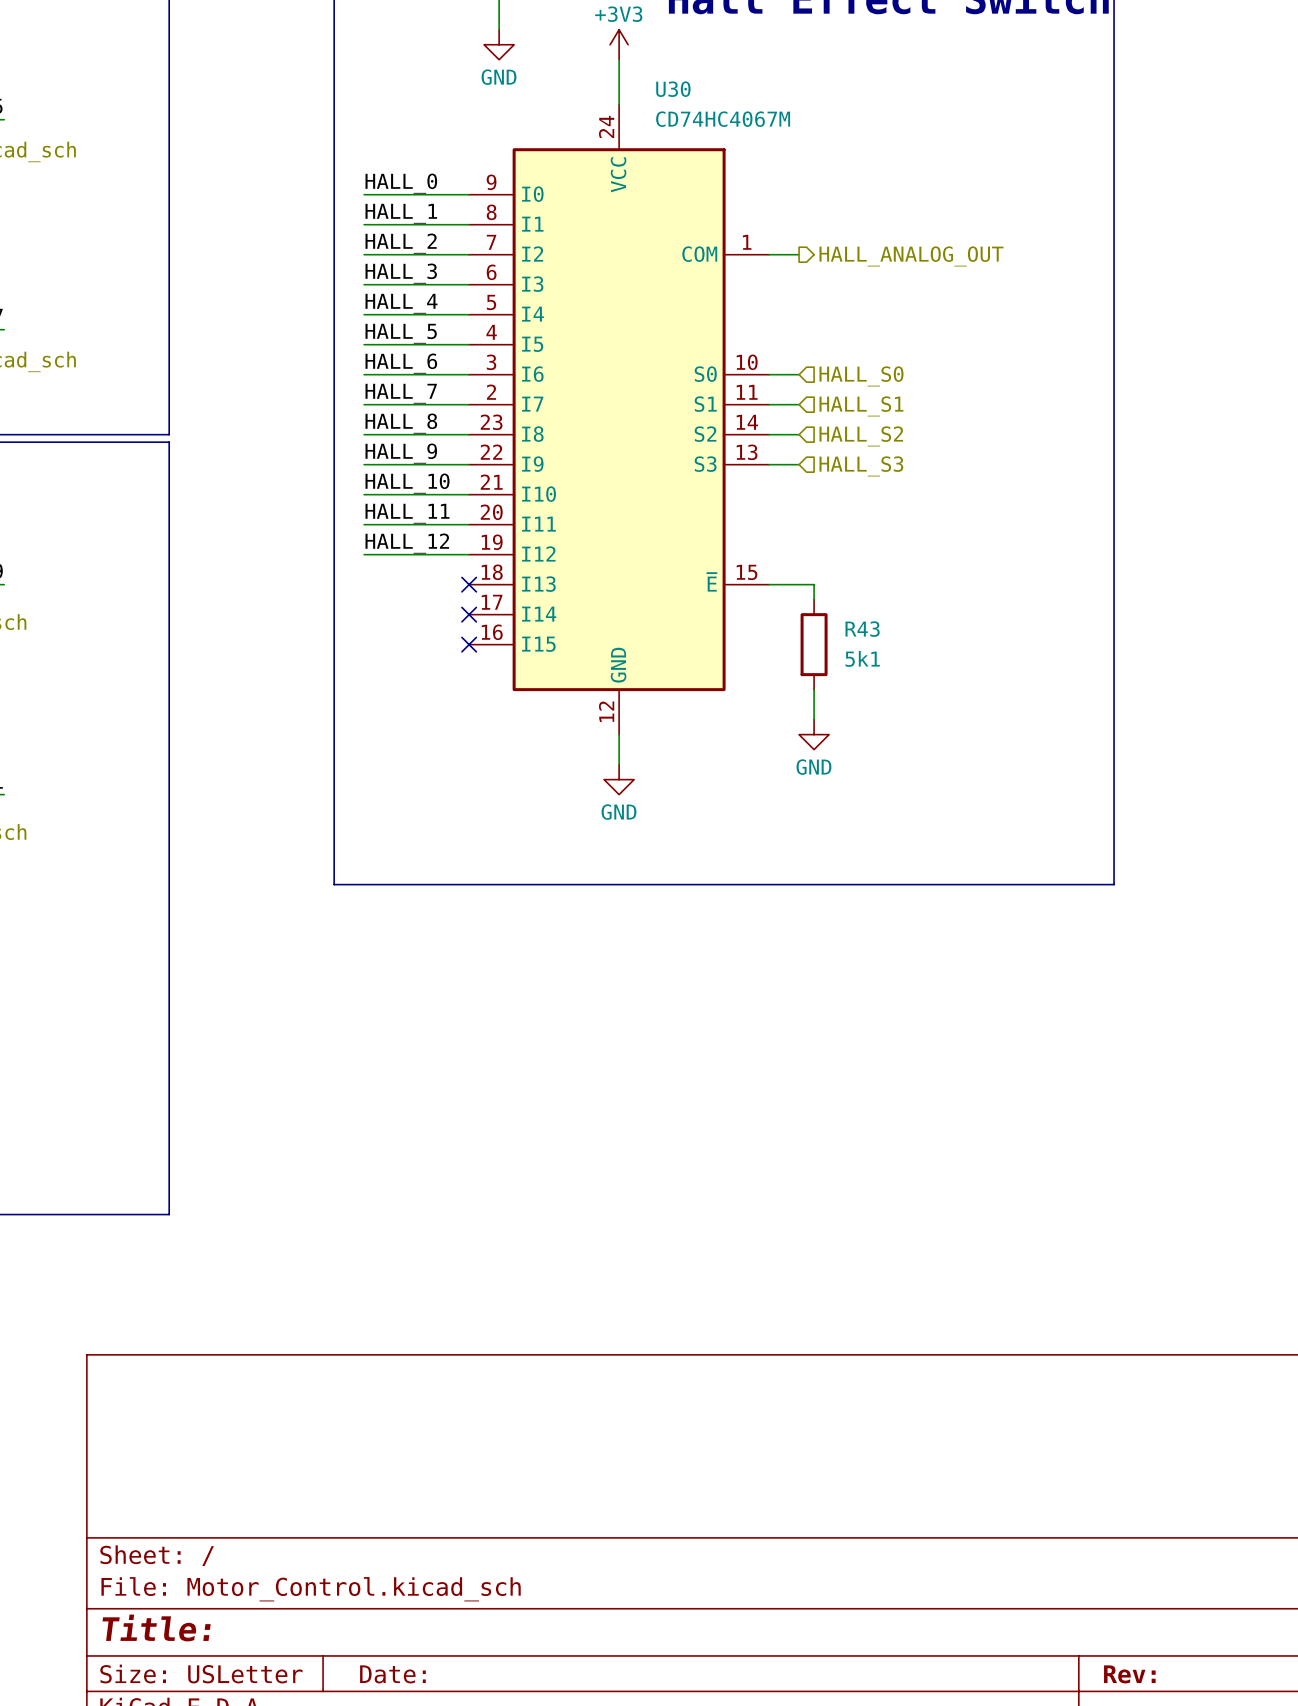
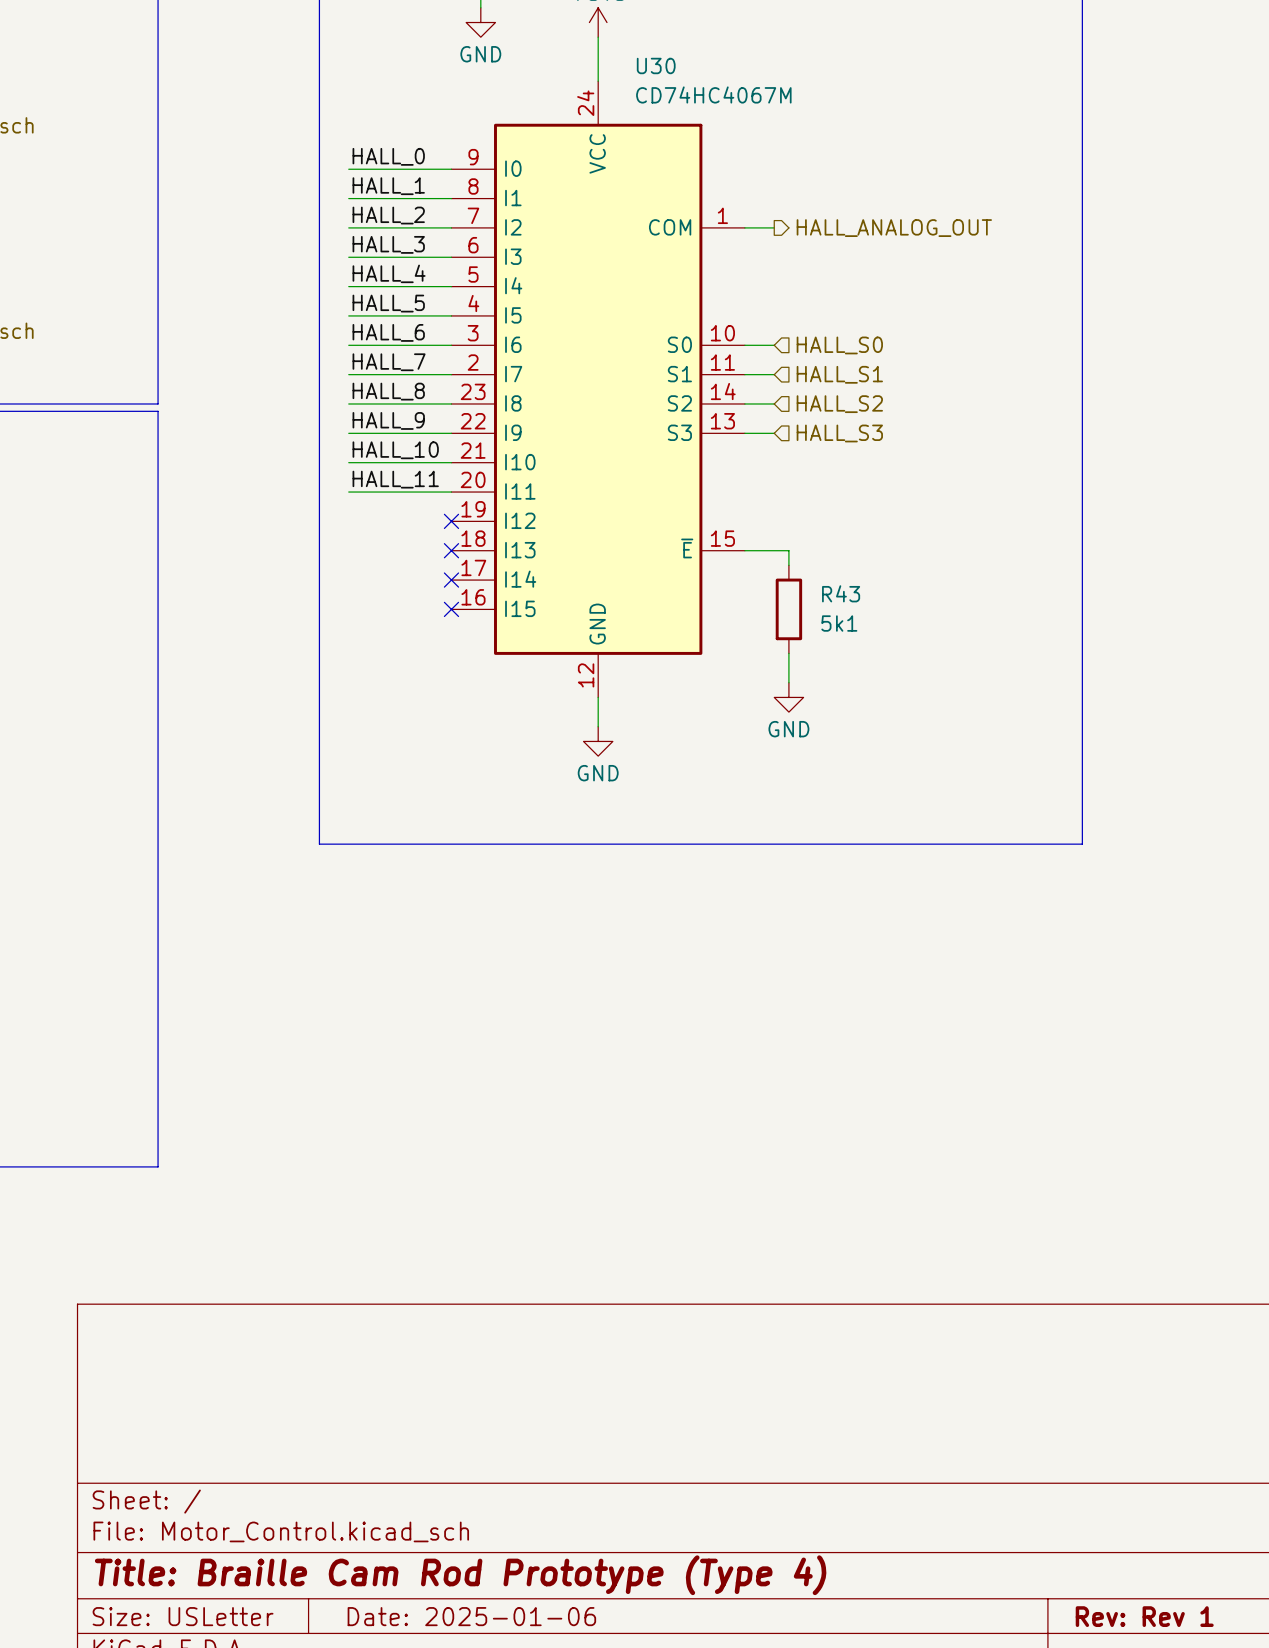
label: HALL_12 (407, 543) -> none
wire: (364, 554) (469, 554) -> none
no-connect mark: none -> (451, 521)
title block: Title: (156, 1627) -> Title: Braille Cam Rod Prototype (Type 4) (460, 1575)
title block: Date: (392, 1674) -> Date: 2025-01-06 (471, 1616)
title block: Rev: (1129, 1674) -> Rev: Rev 1 (1144, 1616)

